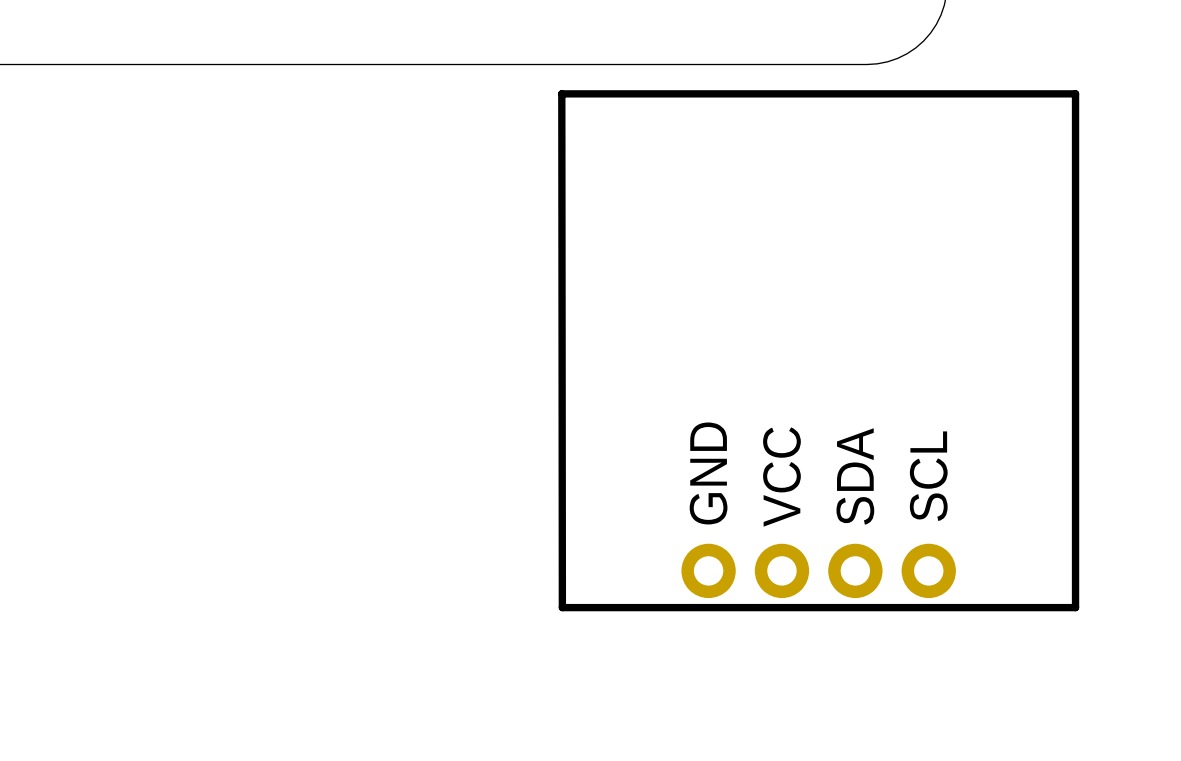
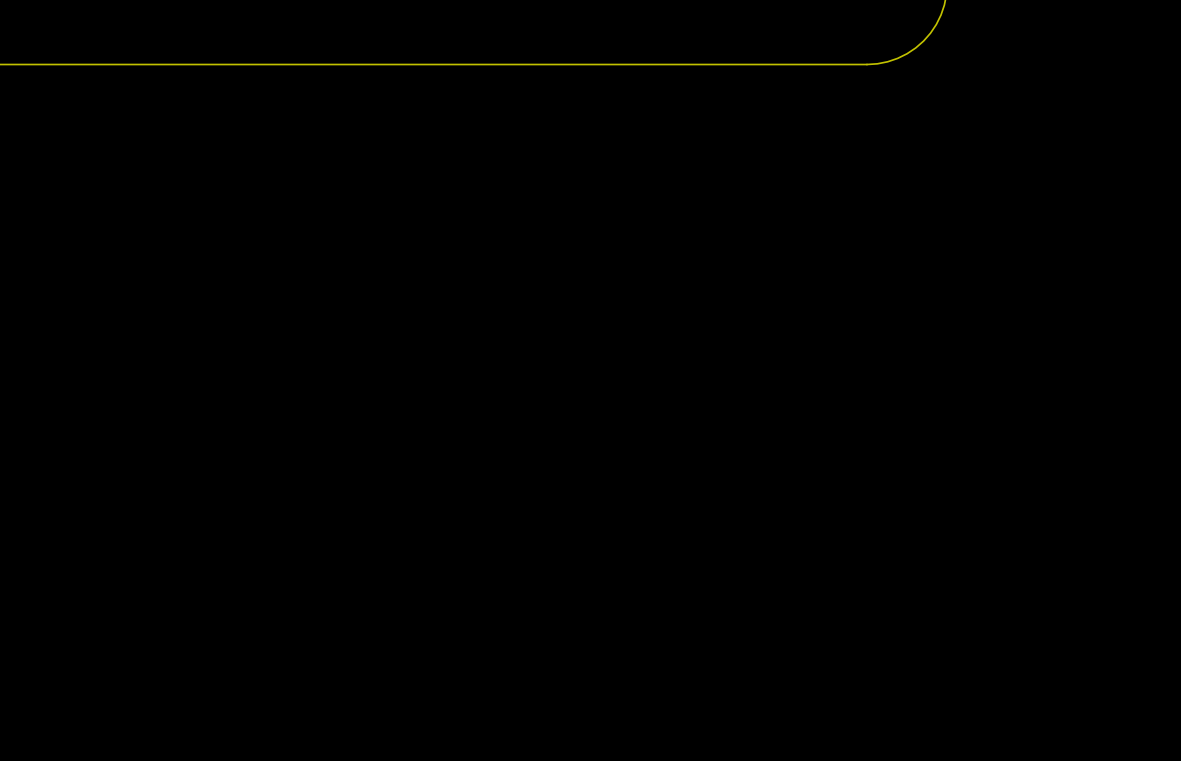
part: (818, 350) -> none

